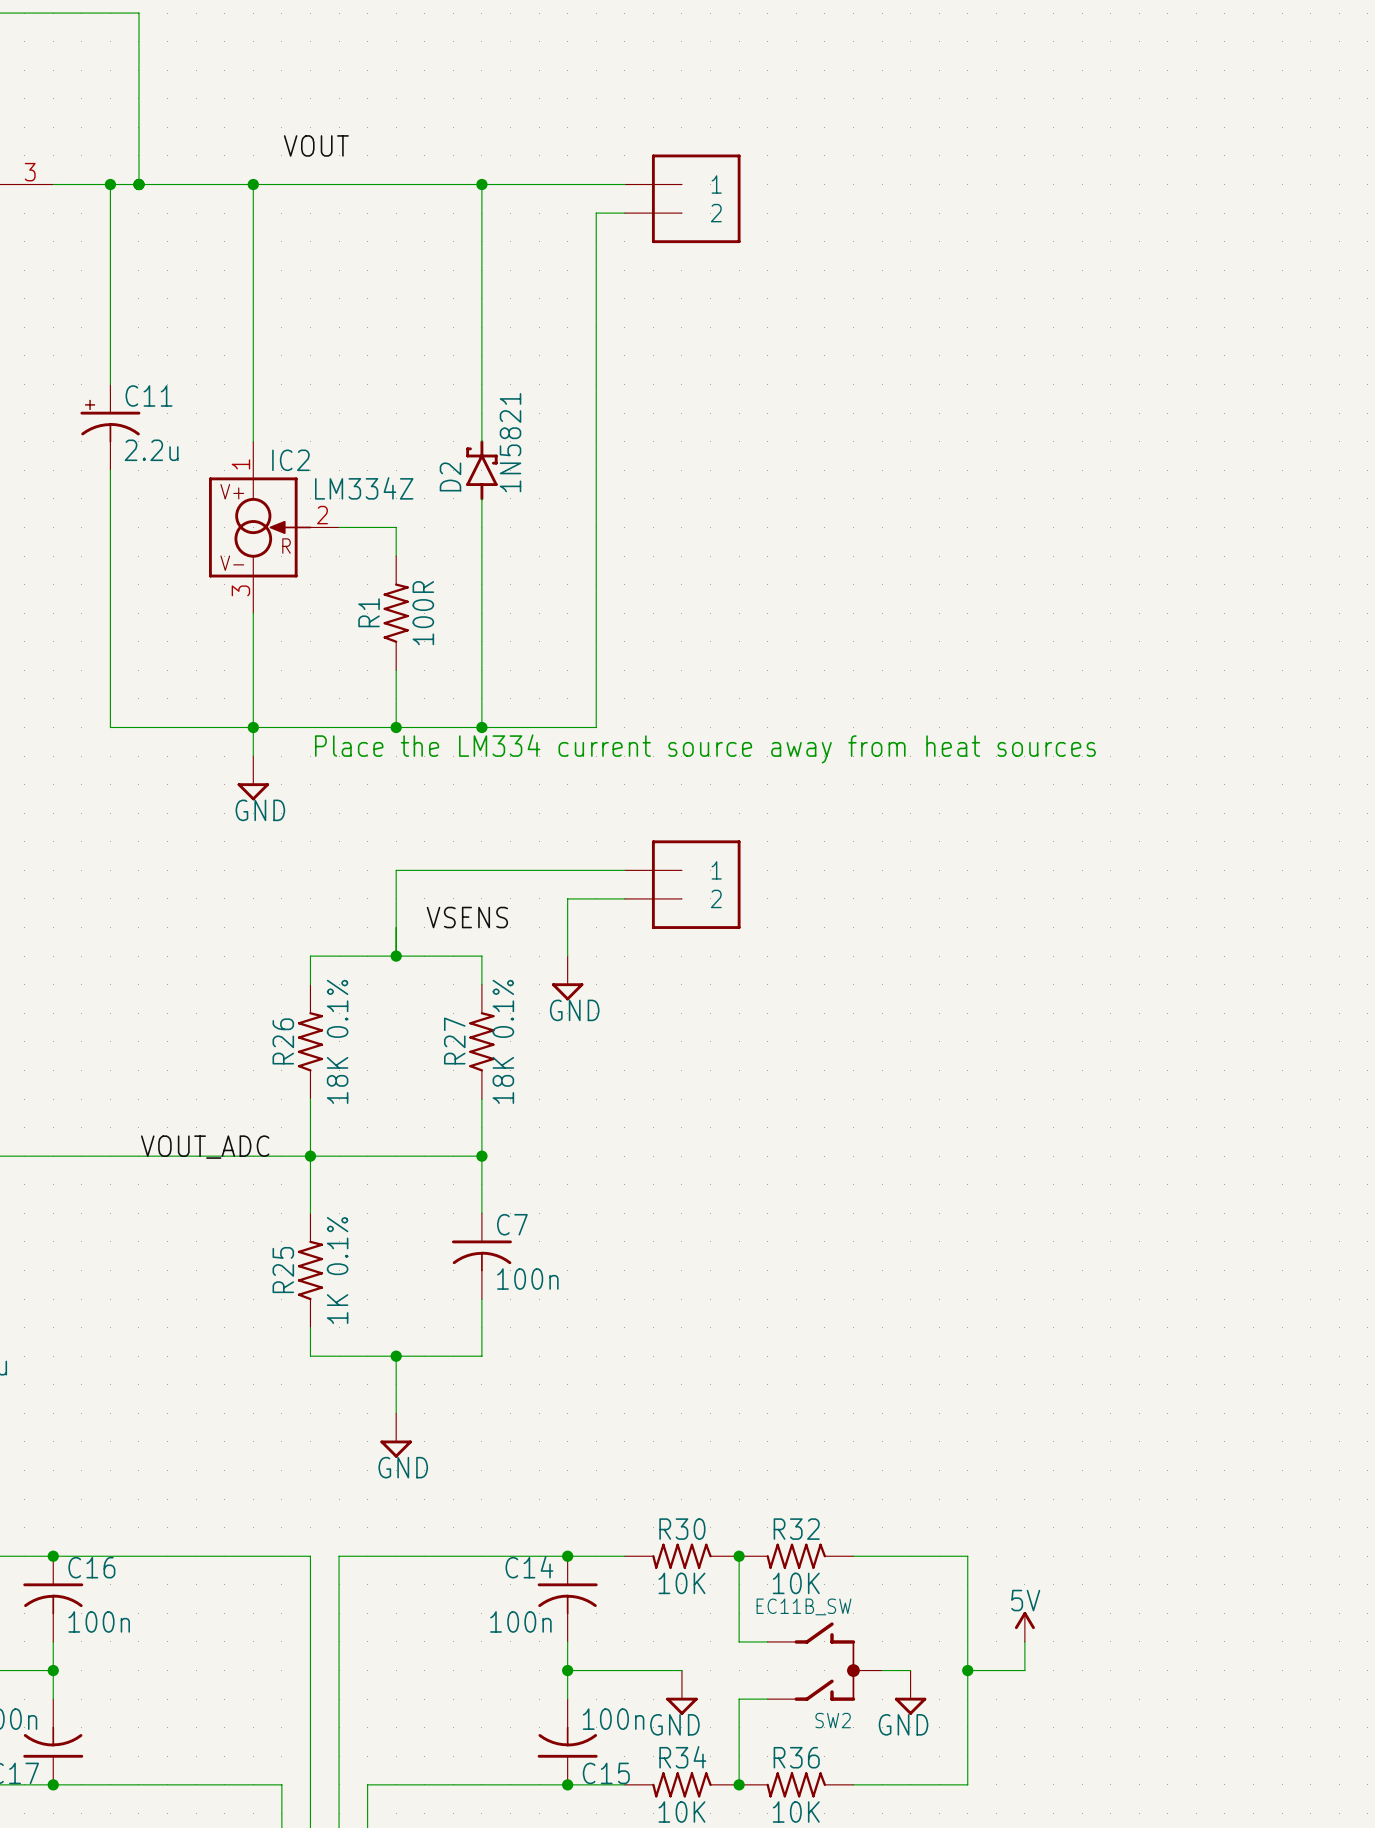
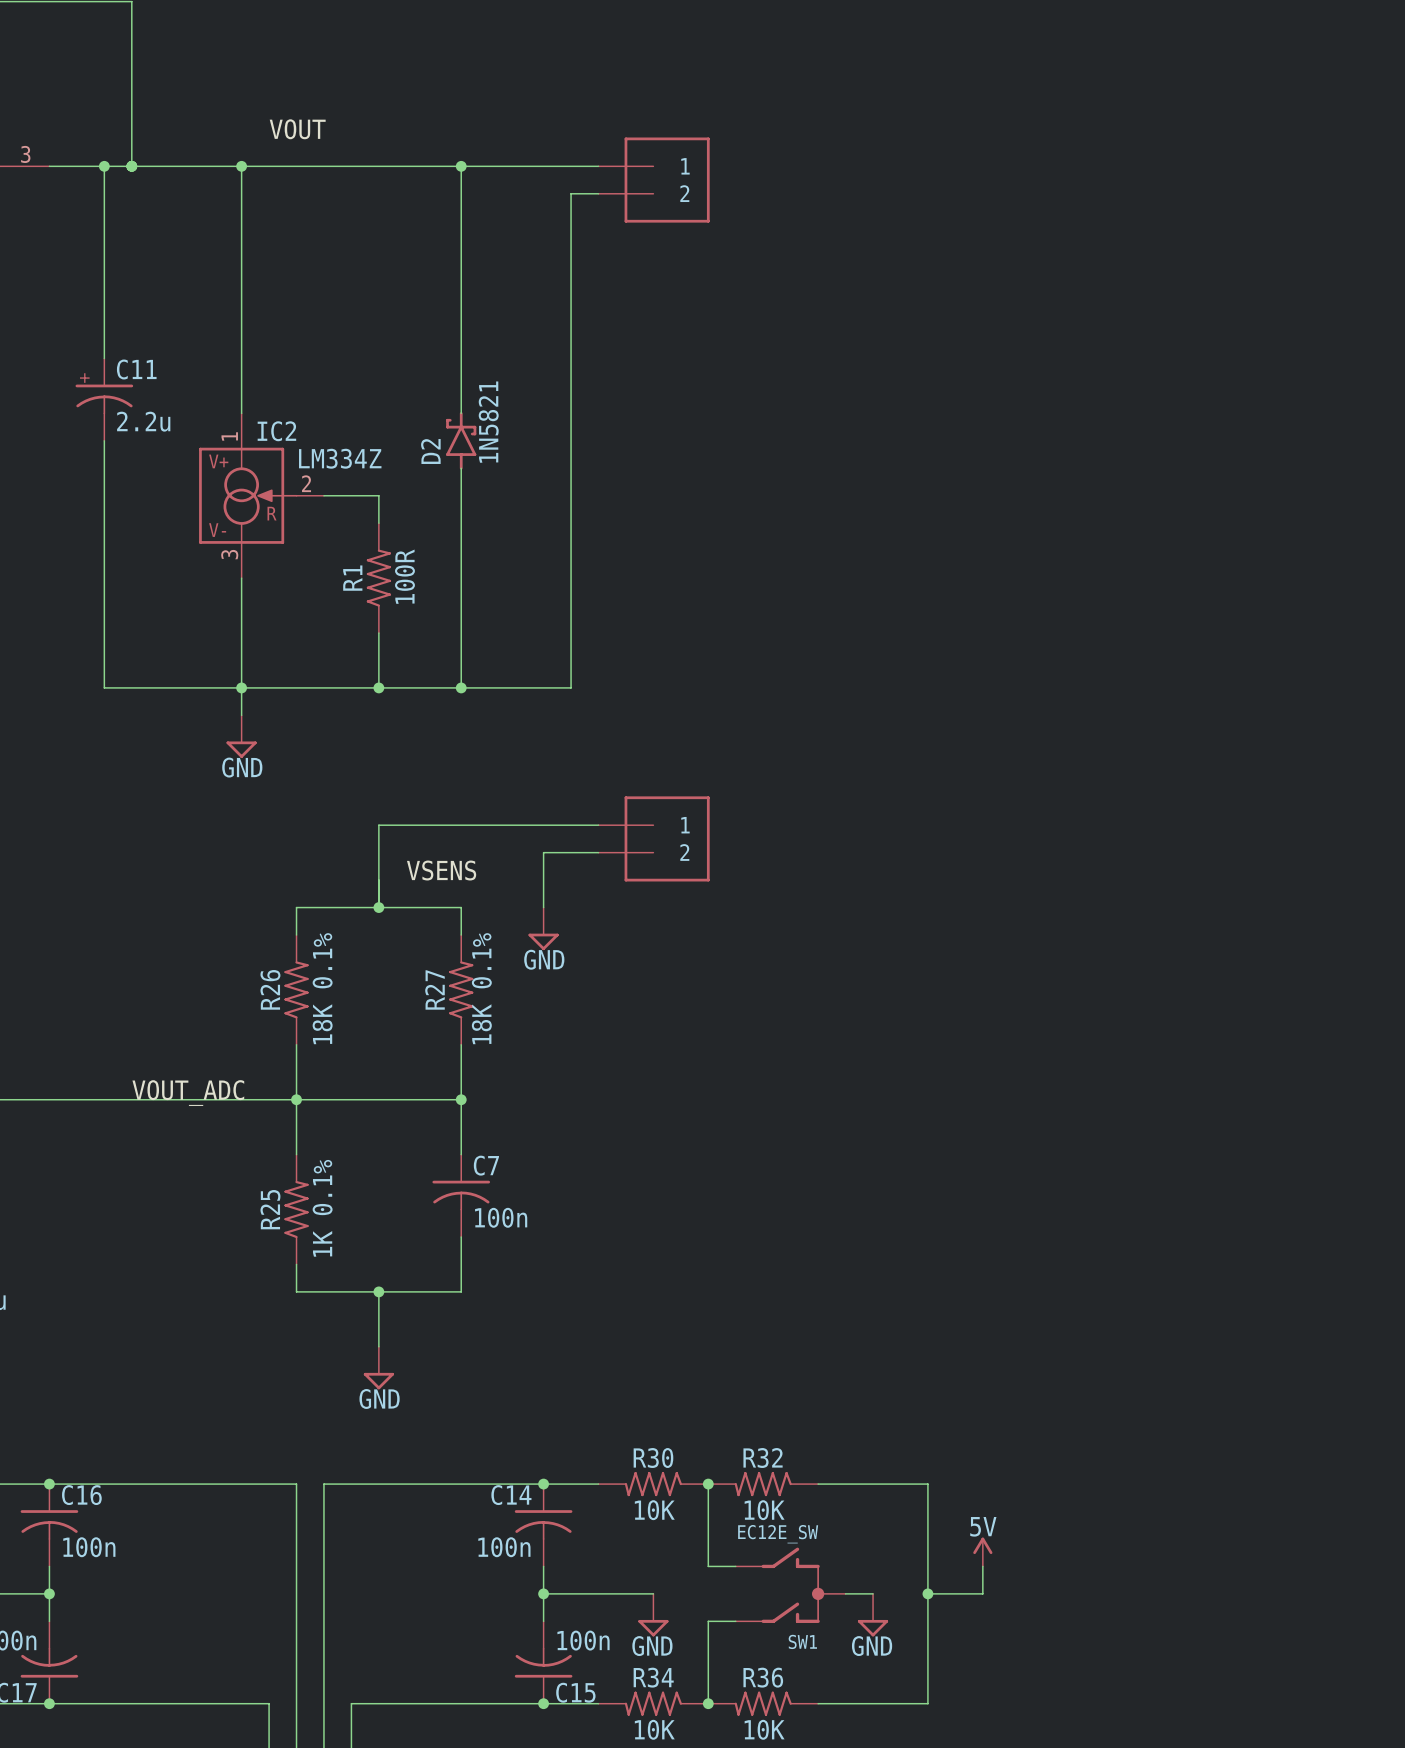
text: Place the LM334 current source away from heat sources (705, 748) -> none
SW2 value: EC11B_SW (803, 1606) -> EC12E_SW (778, 1534)
SW2 name: SW2 (833, 1720) -> SW1 (802, 1641)

